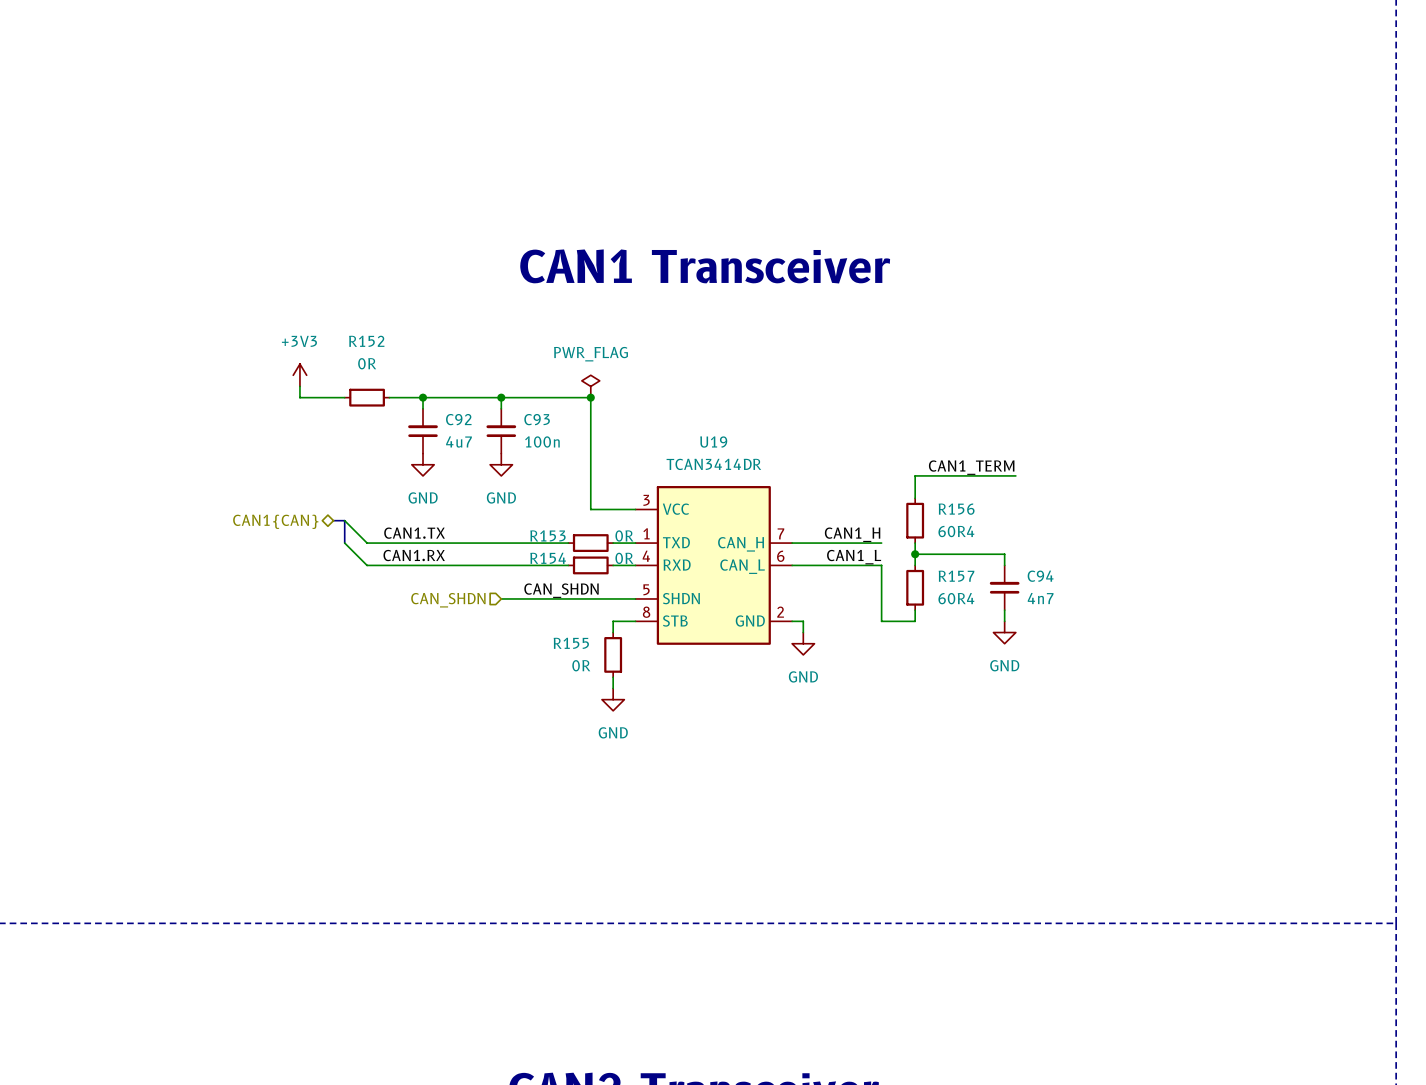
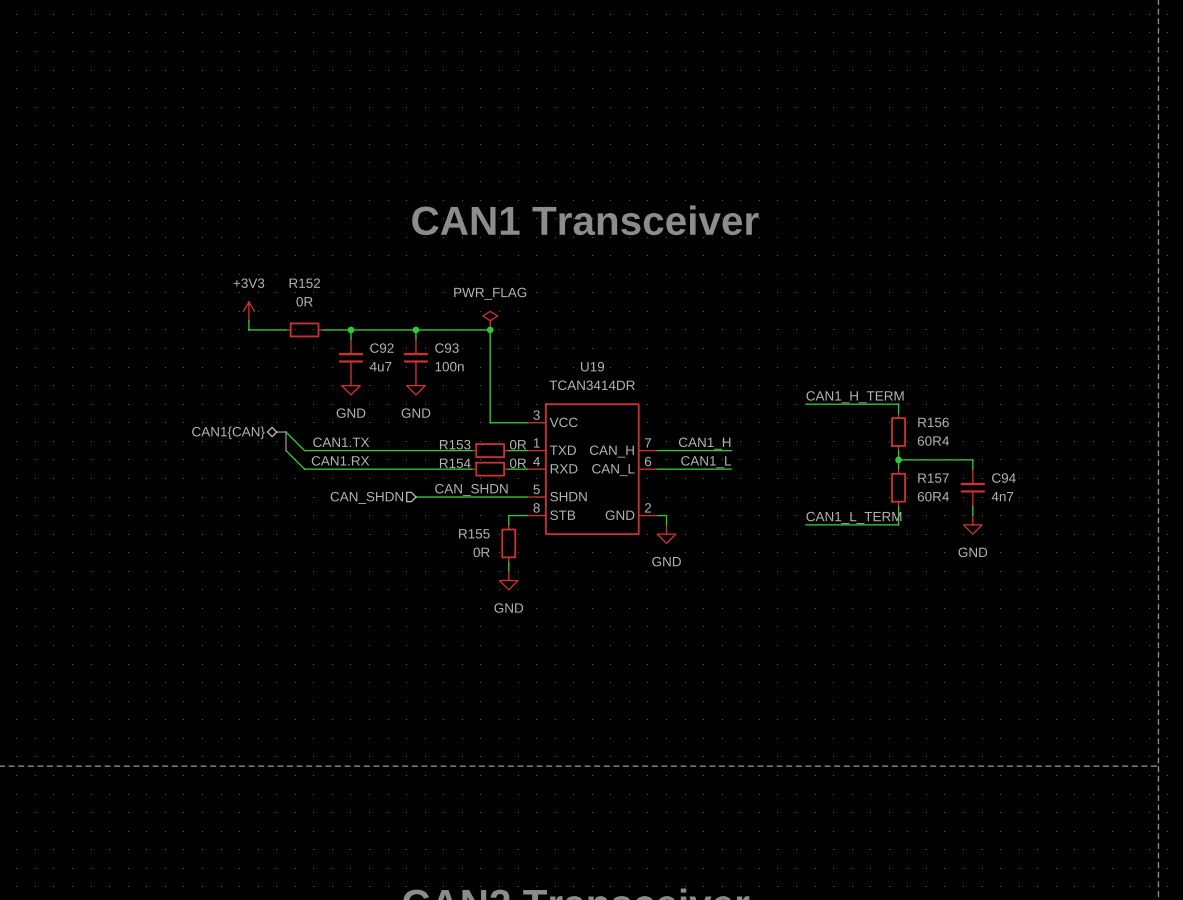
label: CAN1_TERM (971, 467) -> CAN1_H_TERM (855, 397)
wire: (1015, 475) (915, 475) (915, 498) -> none
wire: none -> (805, 404) (898, 404) (898, 413)
R156 position: (915, 520) -> (898, 432)
wire: (915, 543) (915, 565) -> (898, 450) (898, 469)
wire: (915, 554) (1004, 554) (1004, 565) -> (898, 459) (972, 459) (972, 469)
junction: (915, 554) -> none
junction: none -> (898, 459)
wire: (881, 565) (881, 621) (915, 621) (915, 610) -> none
R157 position: (915, 587) -> (898, 487)
C94 position: (1004, 587) -> (972, 487)
wire: (1004, 610) (1004, 621) -> (972, 506) (972, 515)
wire: none -> (898, 506) (898, 524) (805, 524)
label: none -> CAN1_L_TERM (853, 517)
power symbol position: GND (1004, 632) -> GND (972, 524)

